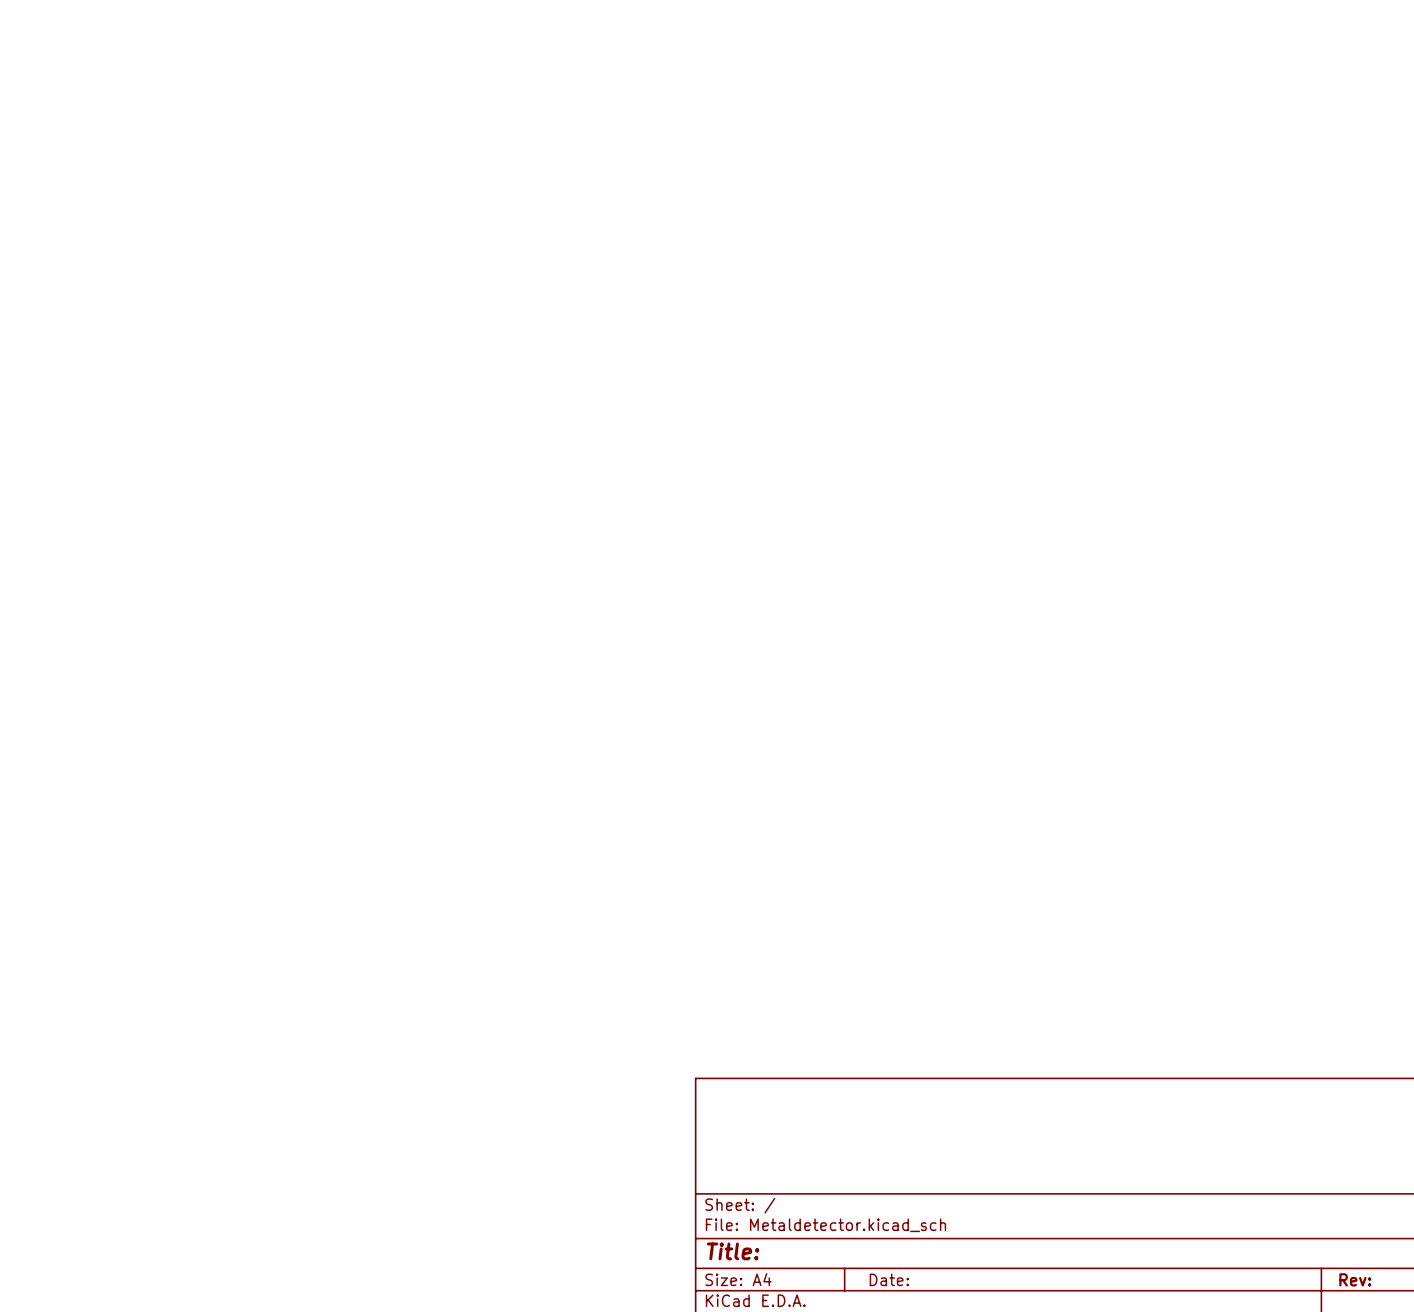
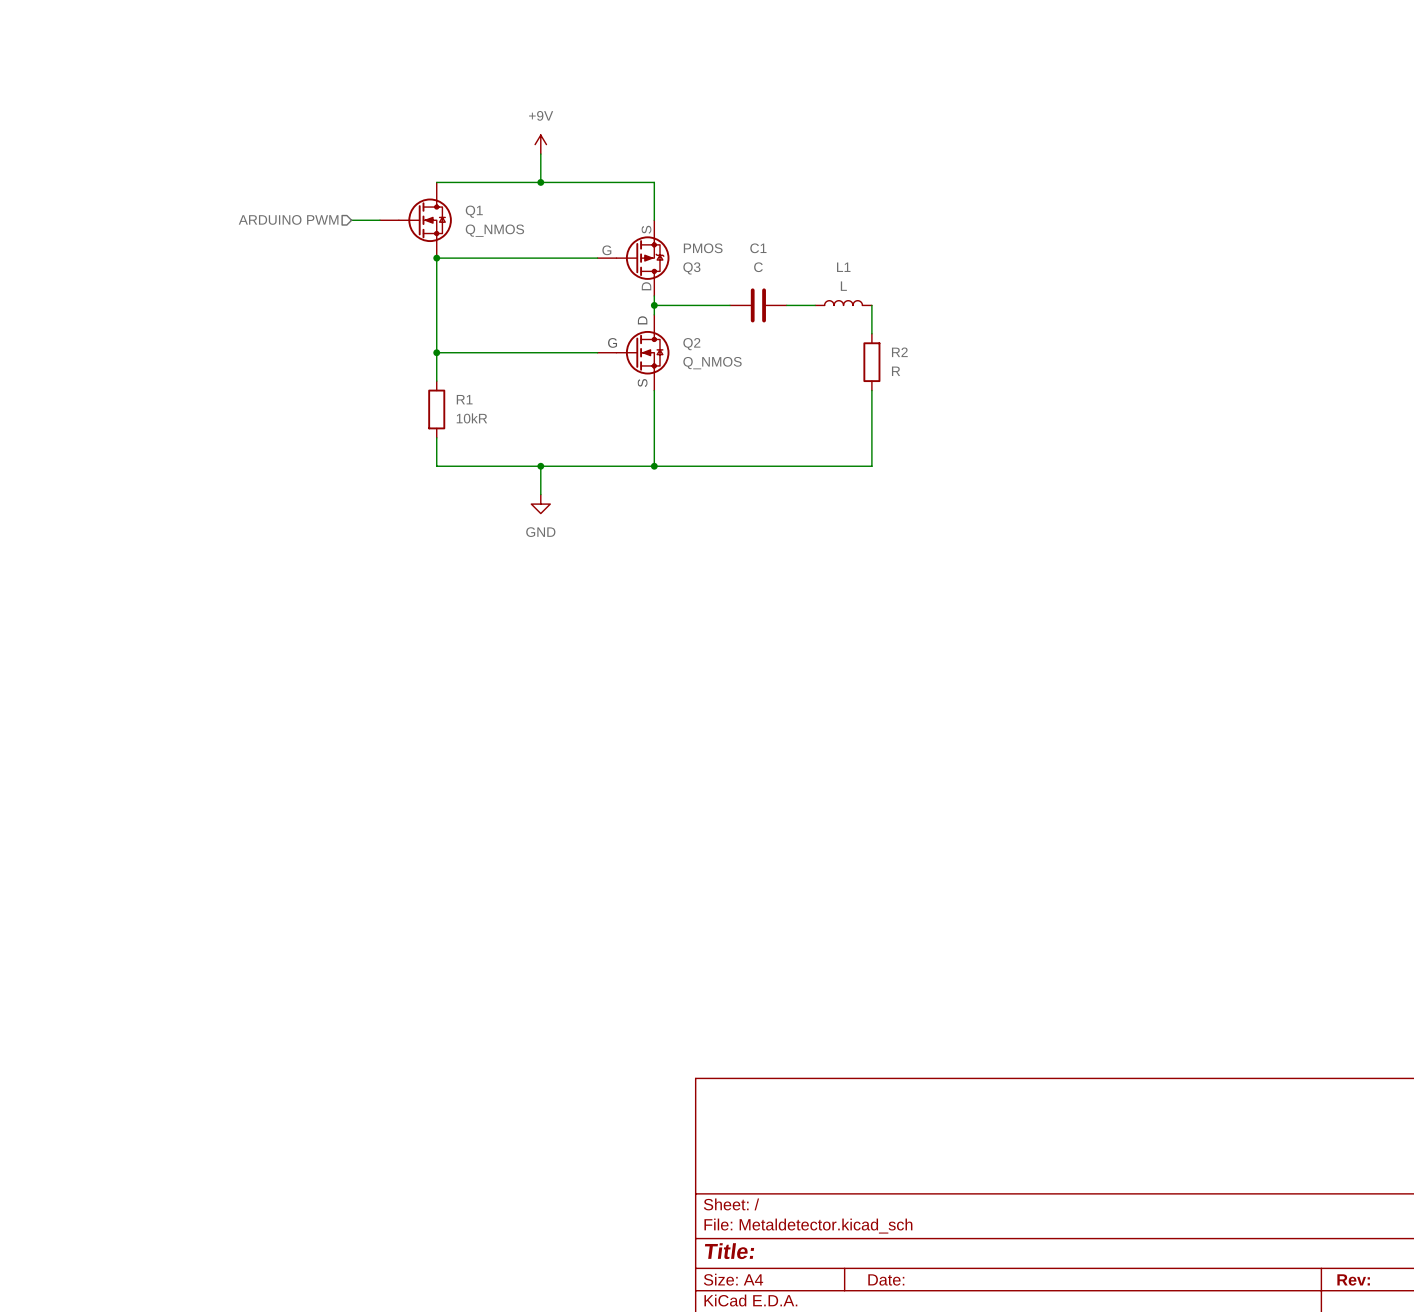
power symbol: none -> +9V (540, 144)
wire: none -> (540, 154) (540, 182)
wire: none -> (436, 182) (654, 182) (654, 220)
junction: none -> (540, 182)
hierarchical label: none -> ARDUINO PWM (288, 219)
wire: none -> (351, 220) (379, 220)
Q1: none -> Q_NMOS (415, 220)
junction: none -> (436, 258)
wire: none -> (597, 258) (436, 258) (436, 381)
Q3: none -> PMOS (633, 258)
wire: none -> (654, 295) (654, 314)
L1: none -> L (843, 303)
wire: none -> (654, 305) (730, 305)
junction: none -> (654, 305)
C1: none -> C (758, 305)
wire: none -> (786, 305) (815, 305)
wire: none -> (871, 305) (871, 333)
text: none -> D (642, 320)
text: none -> G (612, 342)
wire: none -> (436, 352) (597, 352)
junction: none -> (436, 352)
Q2: none -> Q_NMOS (633, 352)
R2: none -> R (871, 362)
text: none -> S (642, 383)
wire: none -> (654, 390) (654, 466)
wire: none -> (871, 390) (871, 466) (436, 466) (436, 437)
R1: none -> 10kR (436, 409)
wire: none -> (540, 466) (540, 494)
junction: none -> (540, 466)
junction: none -> (654, 466)
power symbol: none -> GND (540, 504)

